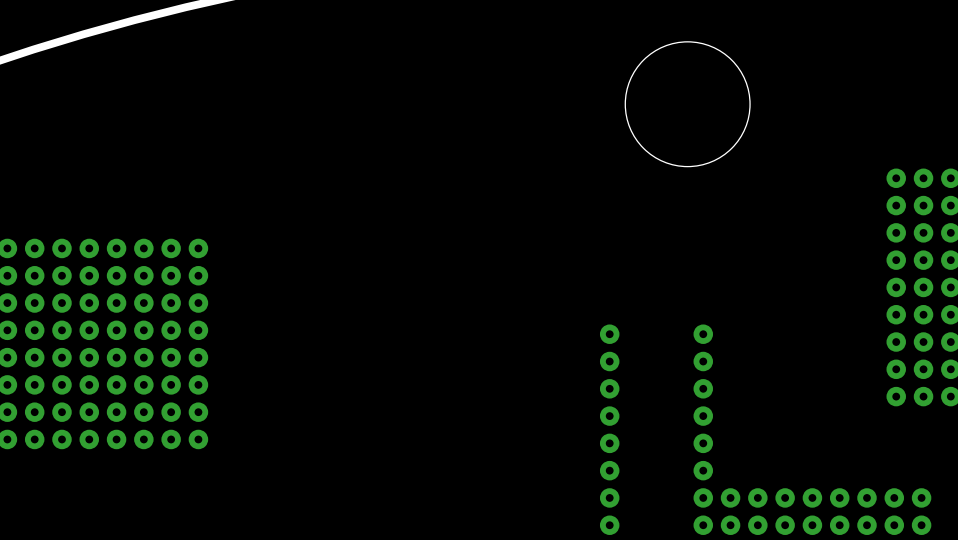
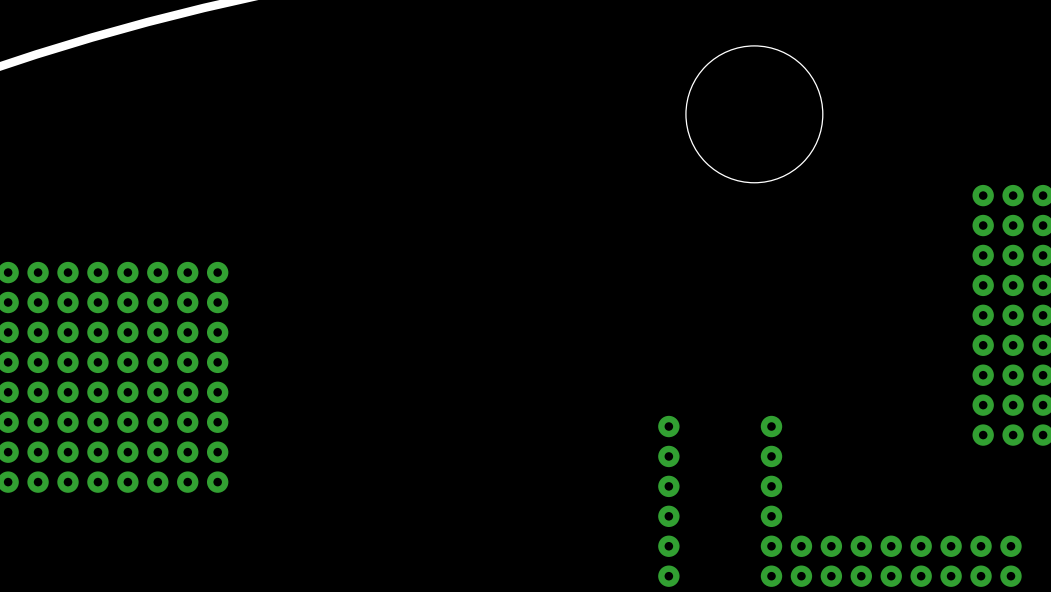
via: (609, 334) -> none
via: (703, 334) -> none
via: (609, 361) -> none
via: (703, 361) -> none

